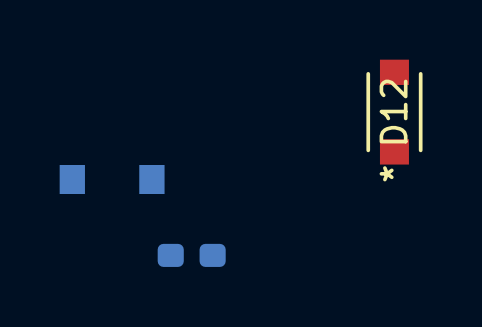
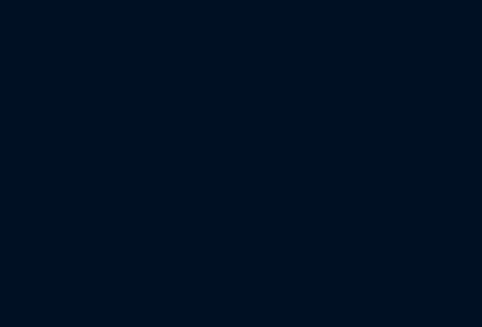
D12: (394, 112) -> none
part: (112, 179) -> none
part: (191, 255) -> none

